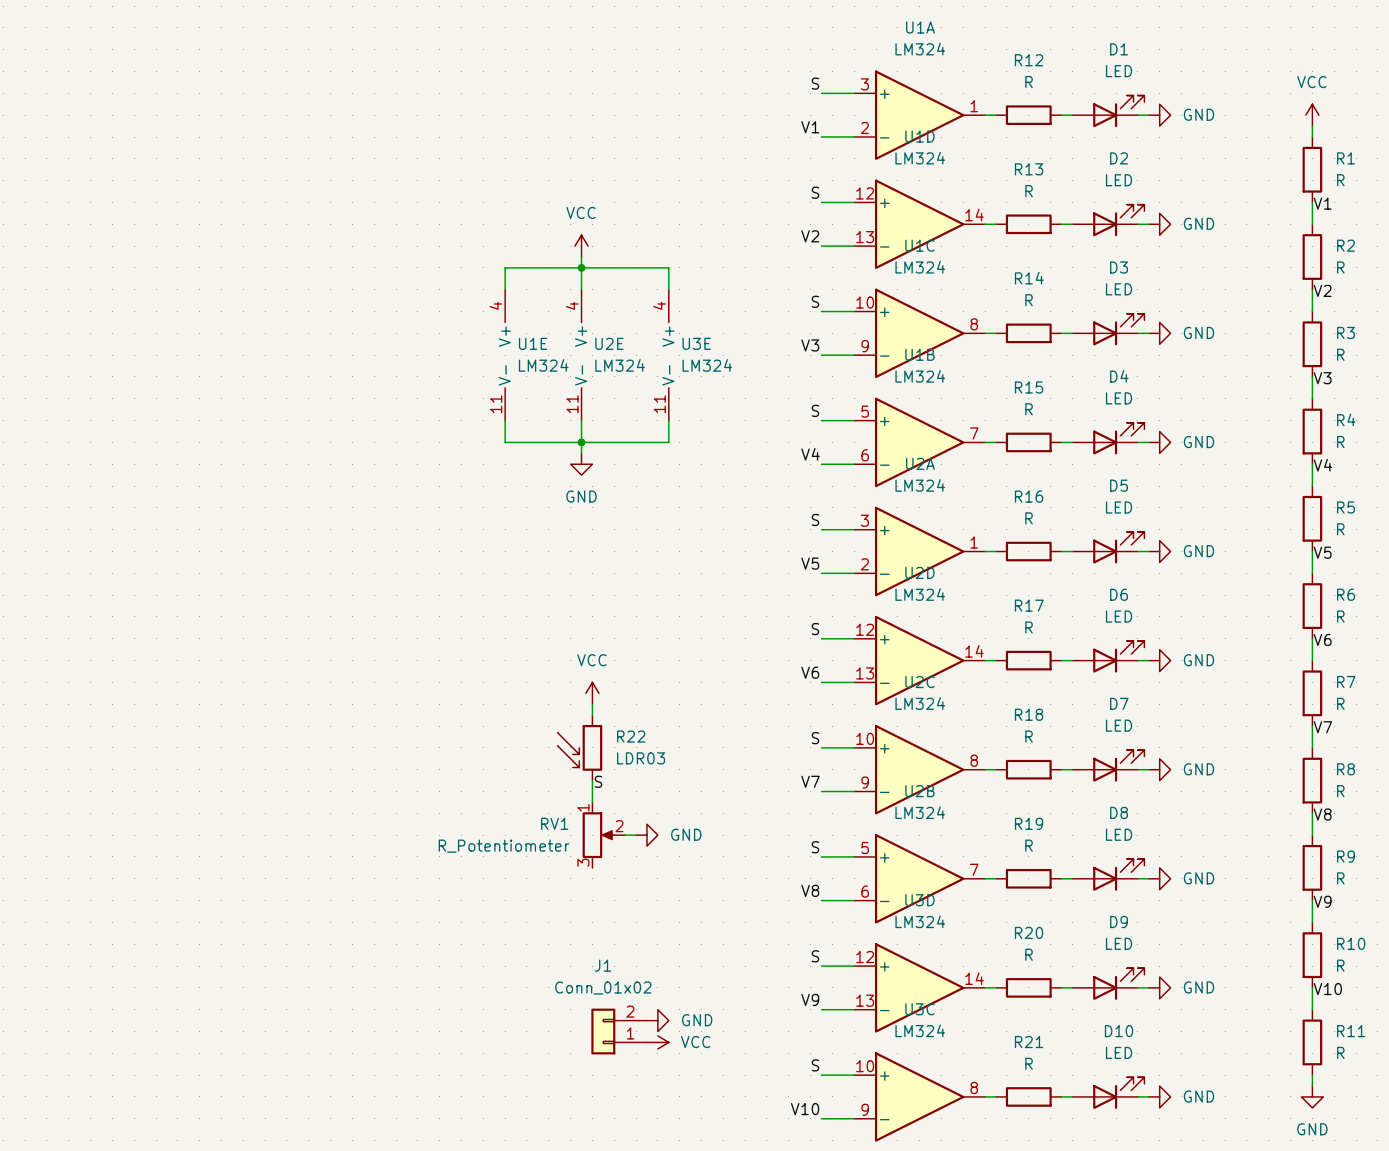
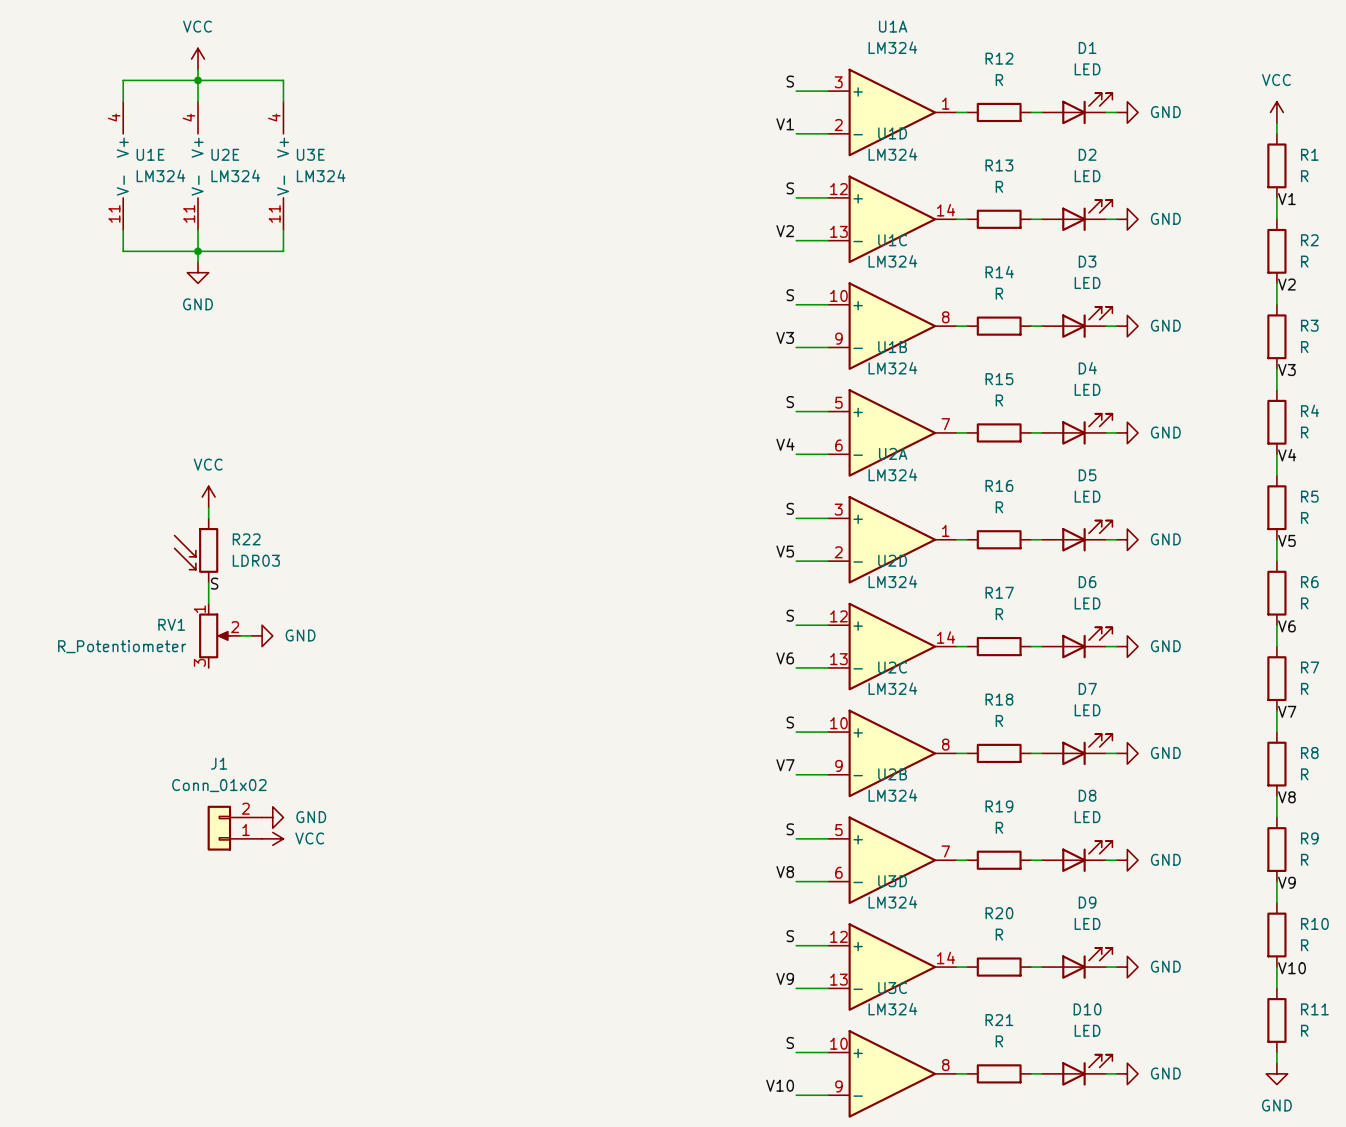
power symbol: none -> VCC (198, 59)
wire: none -> (198, 69) (198, 101)
junction: none -> (198, 80)
wire: none -> (123, 101) (123, 80) (283, 80) (283, 101)
wire: none -> (123, 229) (123, 251) (283, 251) (283, 229)
wire: none -> (198, 229) (198, 262)
power symbol: VCC (581, 246) -> none
junction: none -> (198, 251)
wire: (581, 256) (581, 289) -> none
junction: (581, 267) -> none
power symbol: none -> GND (198, 272)
wire: (505, 289) (505, 267) (668, 267) (668, 289) -> none
U1E position: (505, 355) -> (123, 165)
U2E position: (581, 355) -> (198, 165)
U3E position: (668, 355) -> (283, 165)
wire: (505, 420) (505, 442) (668, 442) (668, 420) -> none
wire: (581, 420) (581, 453) -> none
junction: (581, 442) -> none
power symbol: GND (581, 464) -> none
power symbol: none -> VCC (208, 497)
wire: none -> (208, 507) (208, 518)
wire: none -> (208, 582) (208, 603)
label: none -> S (214, 583)
wire: none -> (240, 635) (251, 635)
power symbol: none -> GND (262, 635)
power symbol: VCC (592, 693) -> none
wire: (592, 704) (592, 715) -> none
R22 position: (579, 747) -> (196, 550)
wire: (592, 780) (592, 802) -> none
label: S (598, 781) -> none
power symbol: none -> GND (272, 817)
RV1 position: (603, 835) -> (219, 635)
wire: (625, 835) (636, 835) -> none
power symbol: GND (646, 835) -> none
power symbol: none -> VCC (272, 838)
power symbol: GND (657, 1020) -> none
J1 position: (619, 1031) -> (234, 828)
power symbol: VCC (657, 1042) -> none

